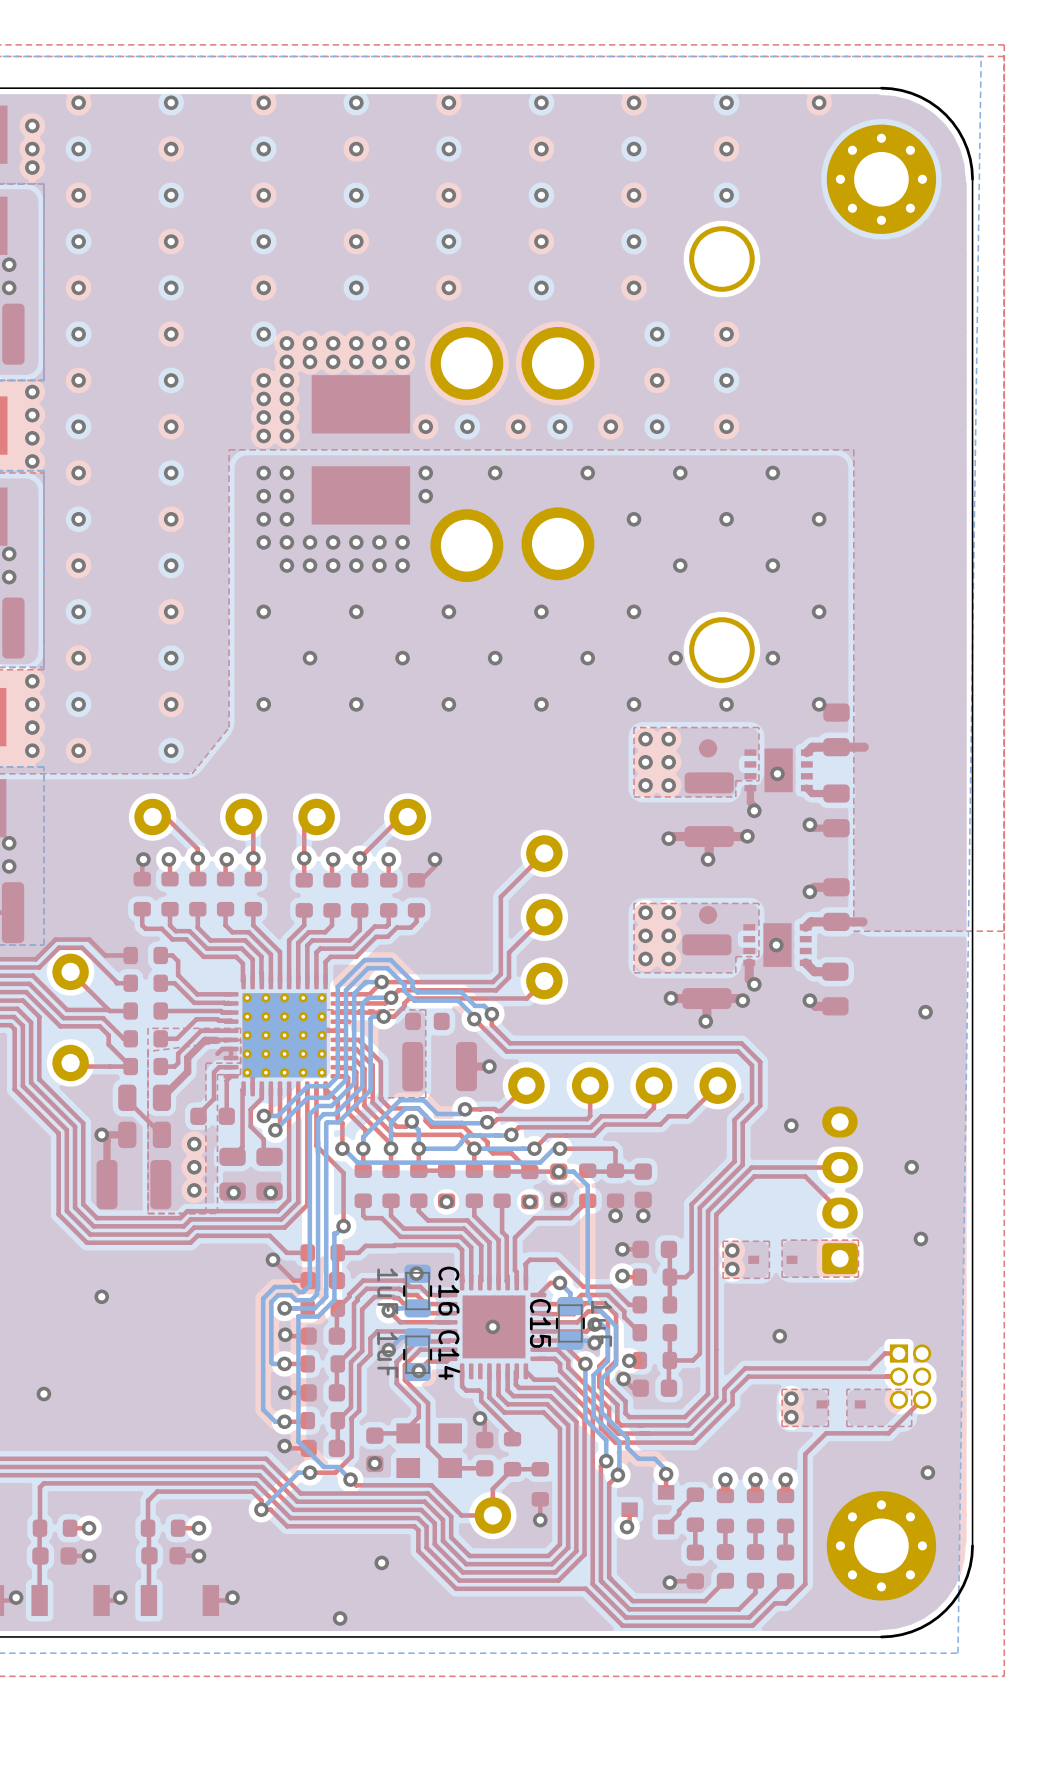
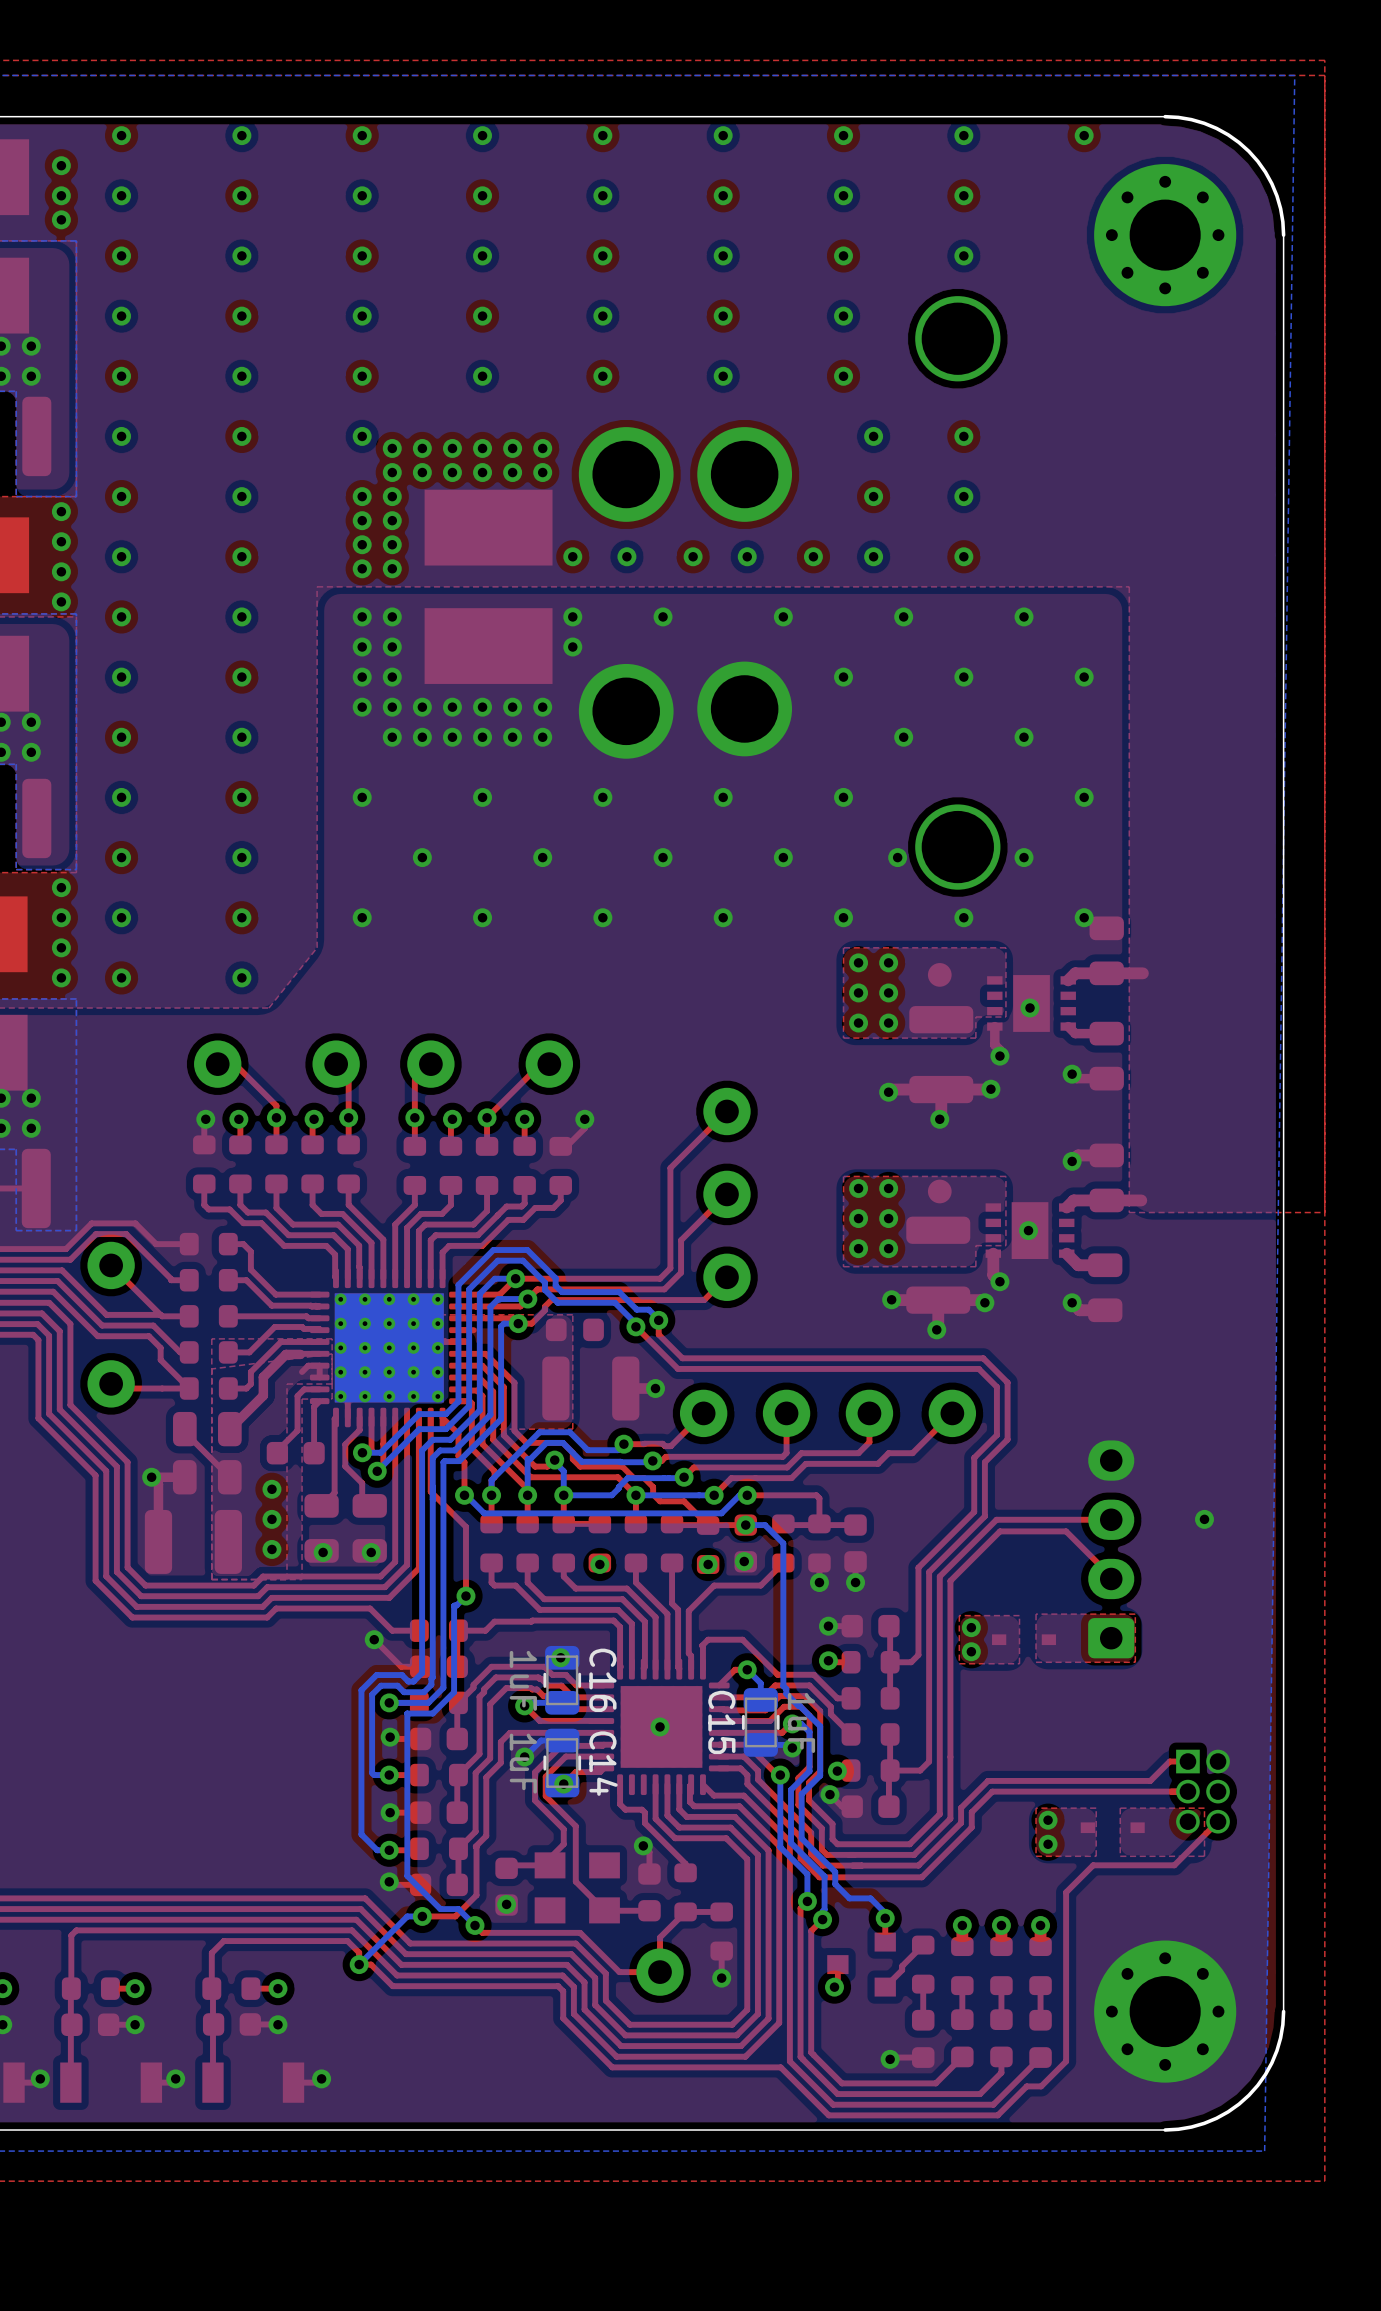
via: (925, 1012) -> none
via: (791, 1125) -> none
via: (920, 1238) -> none
via: (101, 1296) -> none
via: (779, 1336) -> none
via: (43, 1394) -> none
via: (927, 1472) -> none
via: (381, 1562) -> none
via: (340, 1618) -> none

